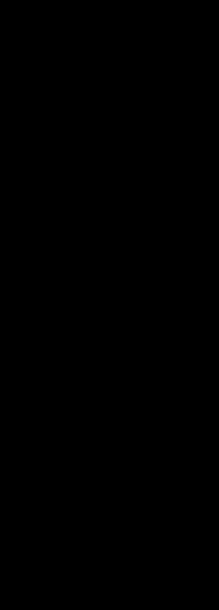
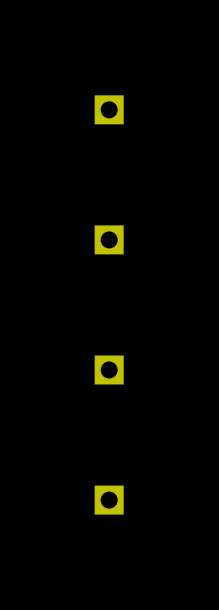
part: none -> (109, 109)
part: none -> (109, 239)
part: none -> (109, 369)
part: none -> (109, 500)

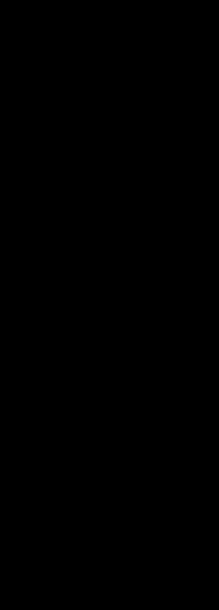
part: (109, 109) -> none
part: (109, 239) -> none
part: (109, 369) -> none
part: (109, 500) -> none

